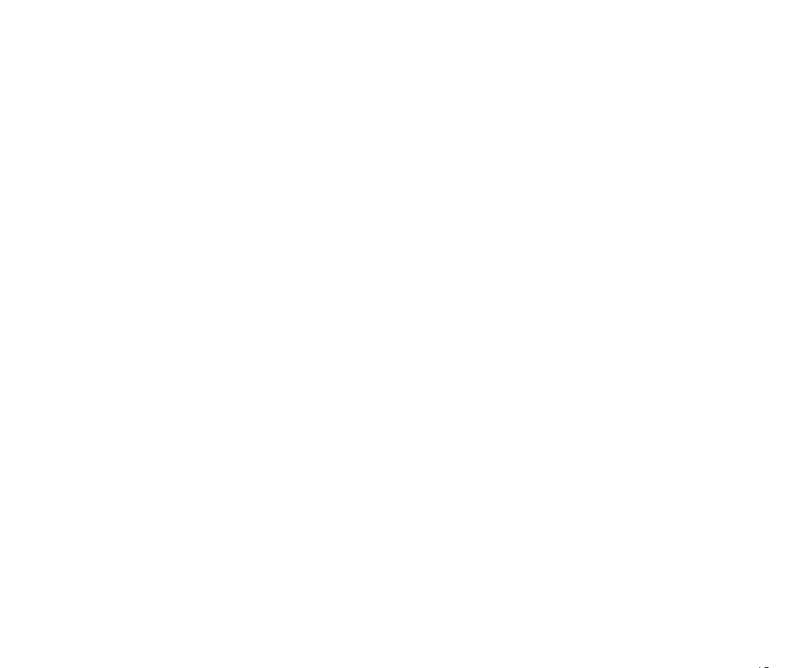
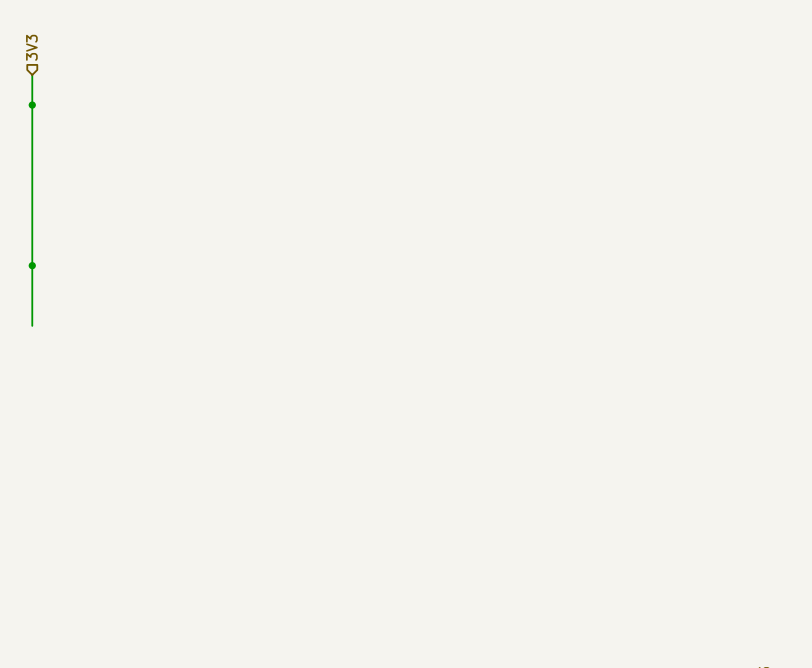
hierarchical label: none -> 3V3 (31, 47)
wire: none -> (32, 74) (32, 325)
junction: none -> (32, 105)
junction: none -> (32, 265)

